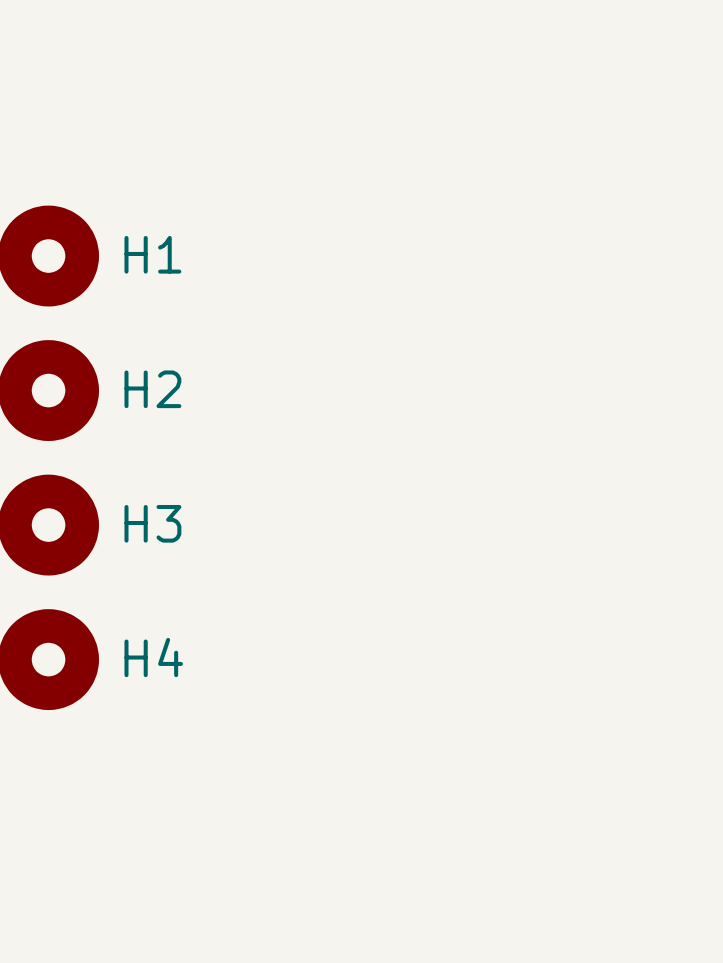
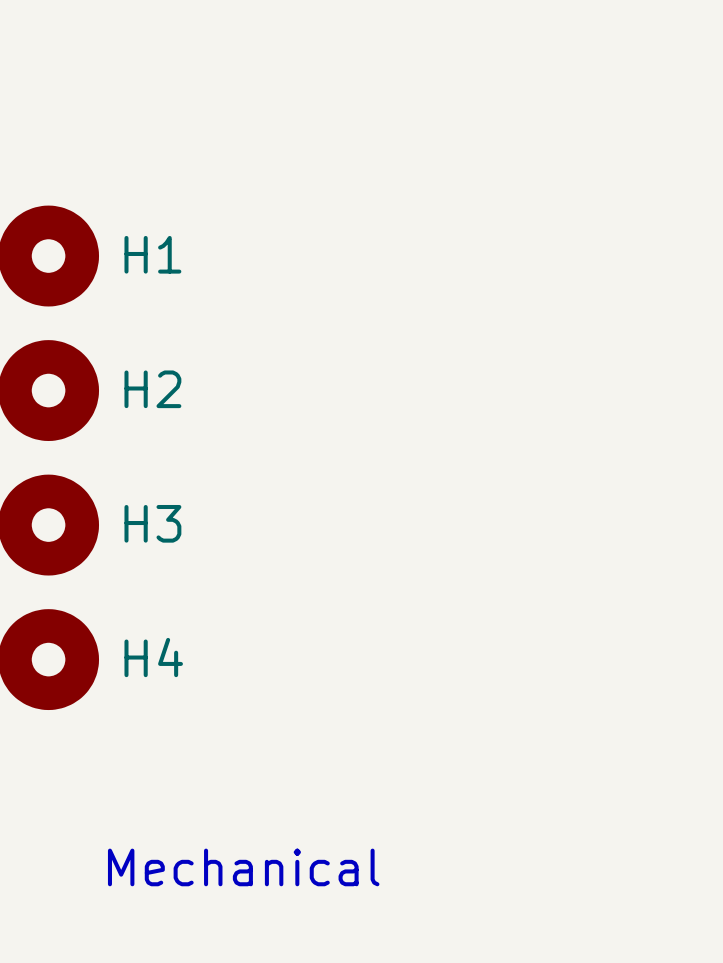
text: none -> Mechanical (243, 867)

